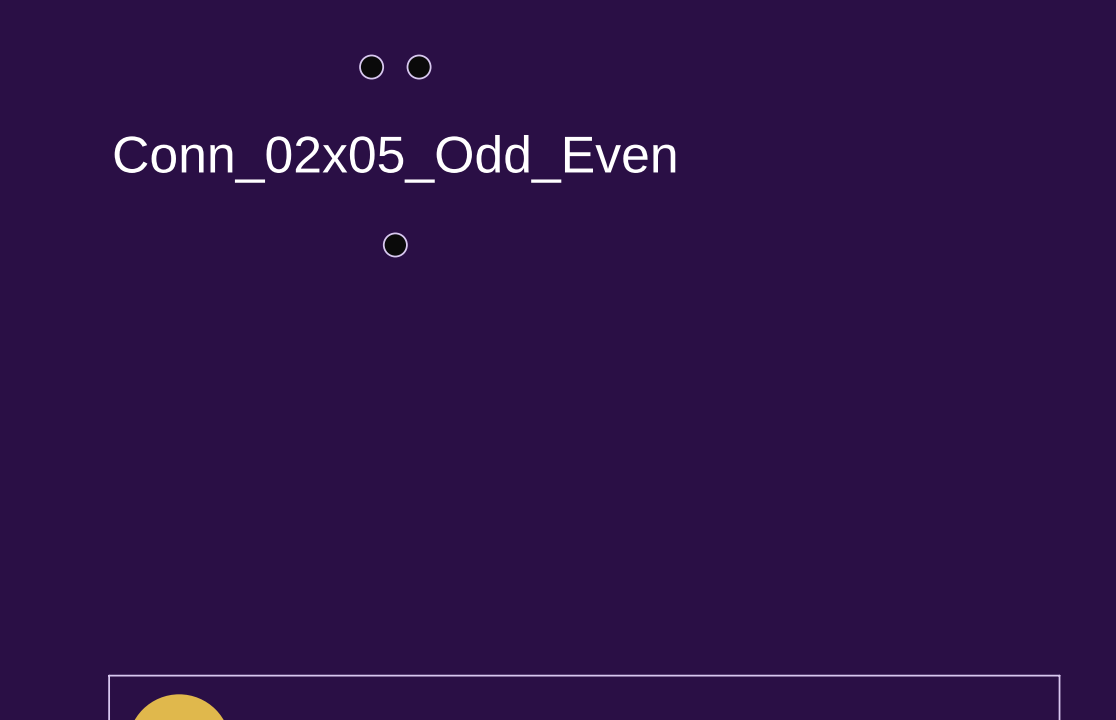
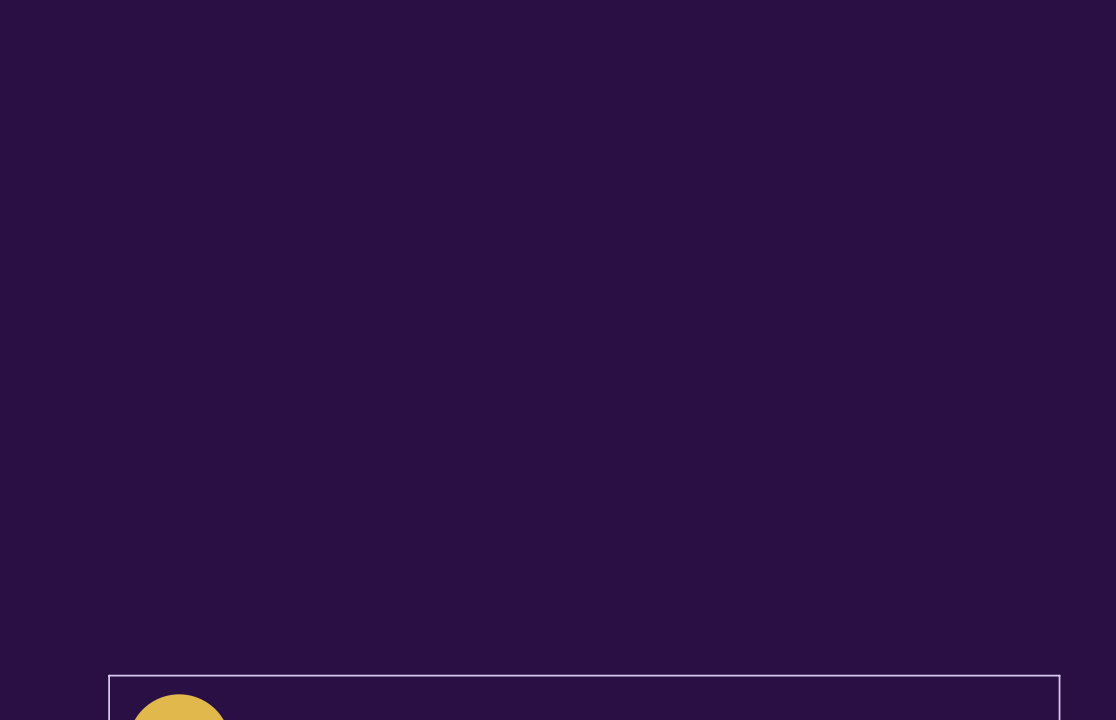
part: Conn_02x05_Odd_Even (395, 156) -> none

